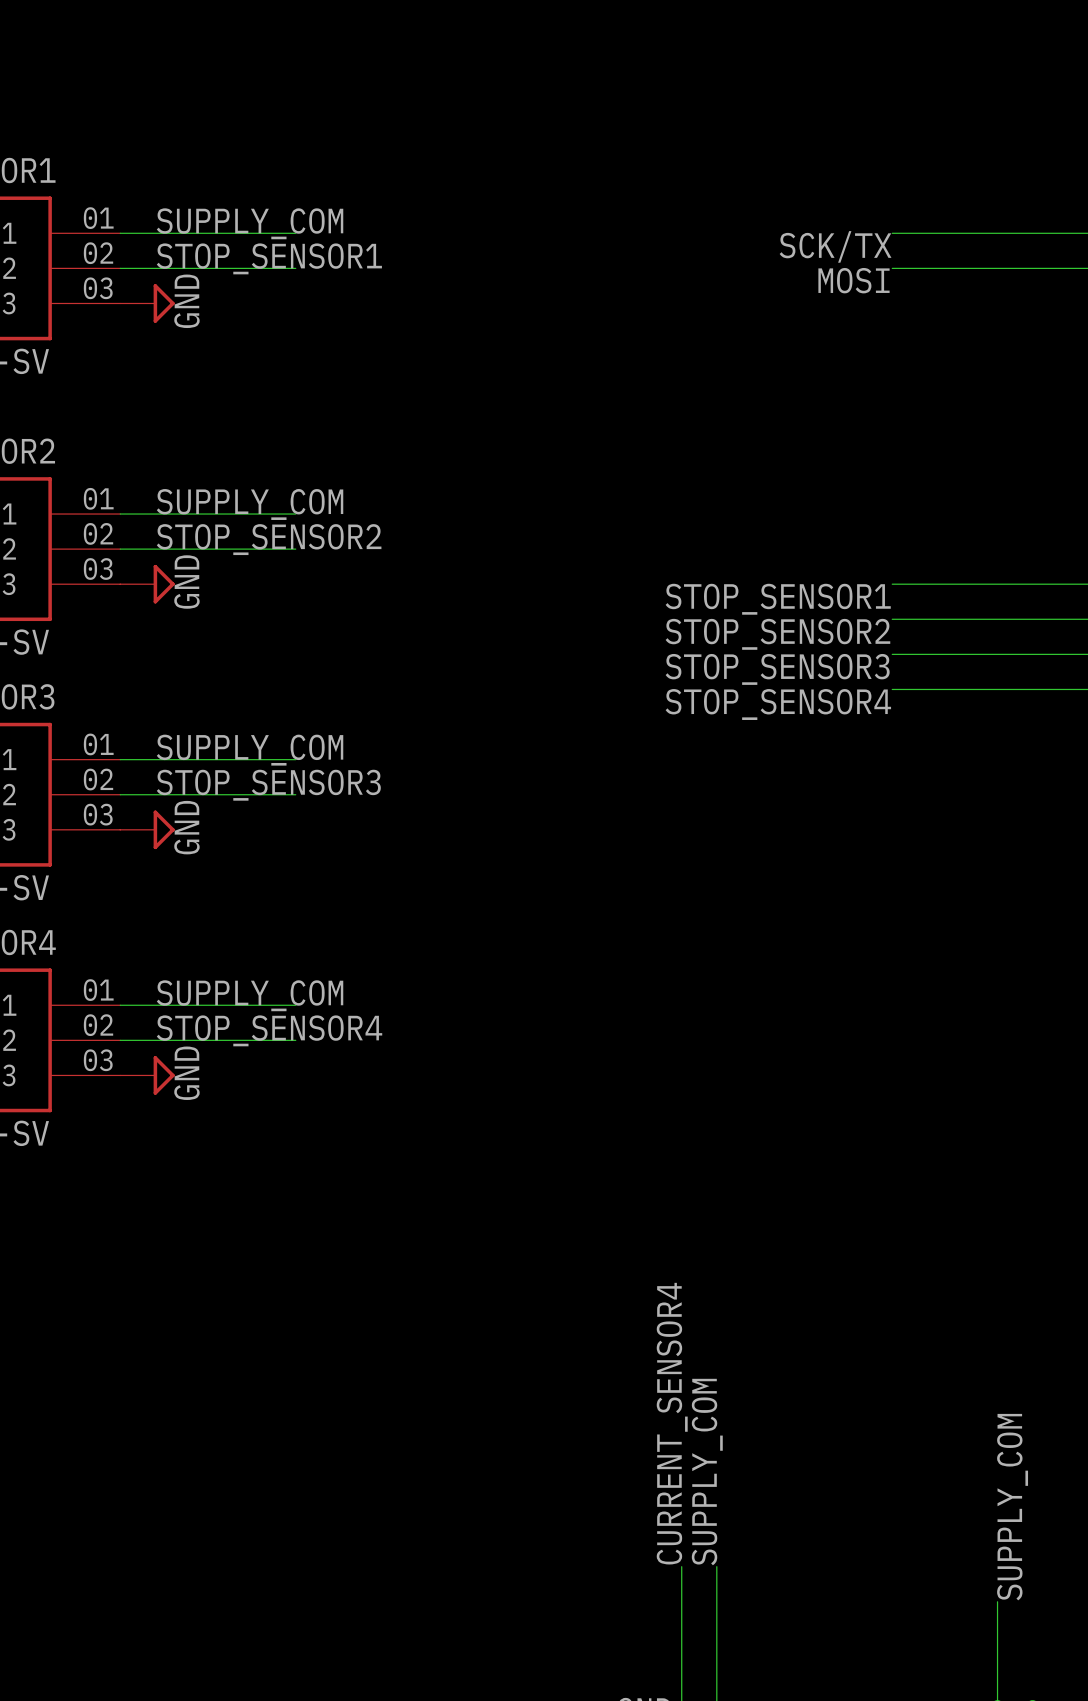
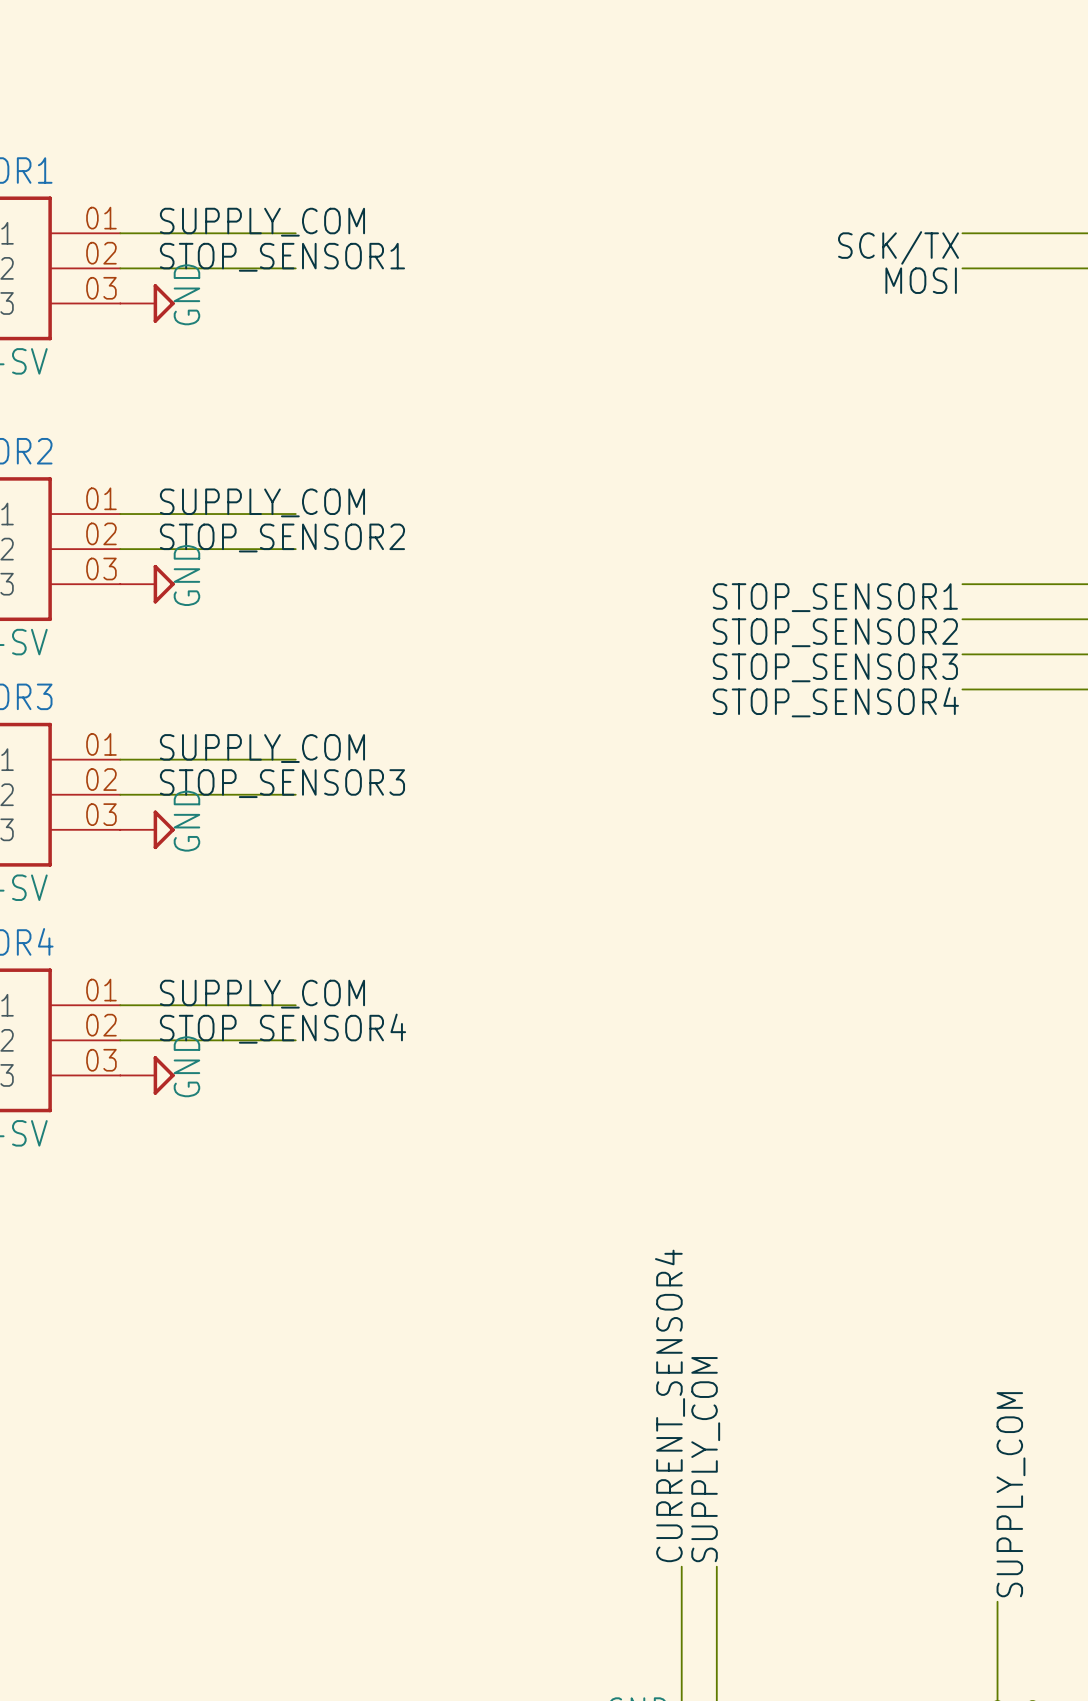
wire: (892, 233) (962, 233) -> none
label position: SCK/TX (835, 246) -> SCK/TX (898, 247)
wire: (892, 268) (962, 268) -> none
label position: MOSI (853, 280) -> MOSI (921, 280)
wire: (892, 584) (962, 584) -> none
label position: STOP_SENSOR1 (778, 599) -> STOP_SENSOR1 (835, 597)
wire: (892, 619) (962, 619) -> none
label position: STOP_SENSOR2 (777, 634) -> STOP_SENSOR2 (835, 632)
wire: (892, 654) (962, 654) -> none
label position: STOP_SENSOR3 (777, 669) -> STOP_SENSOR3 (835, 667)
wire: (892, 689) (962, 689) -> none
label position: STOP_SENSOR4 (778, 704) -> STOP_SENSOR4 (835, 702)

